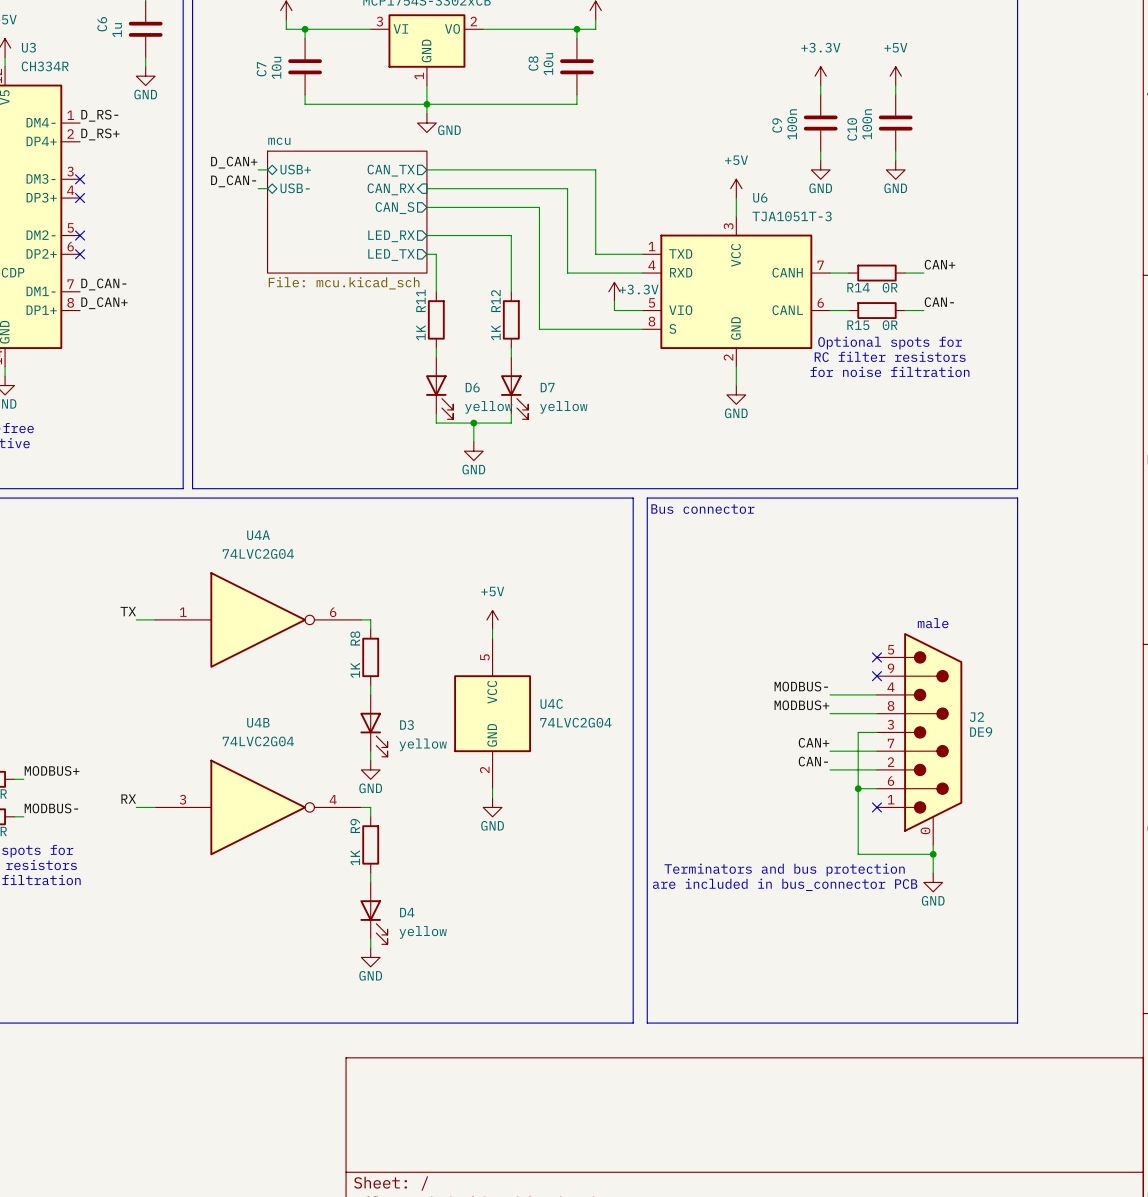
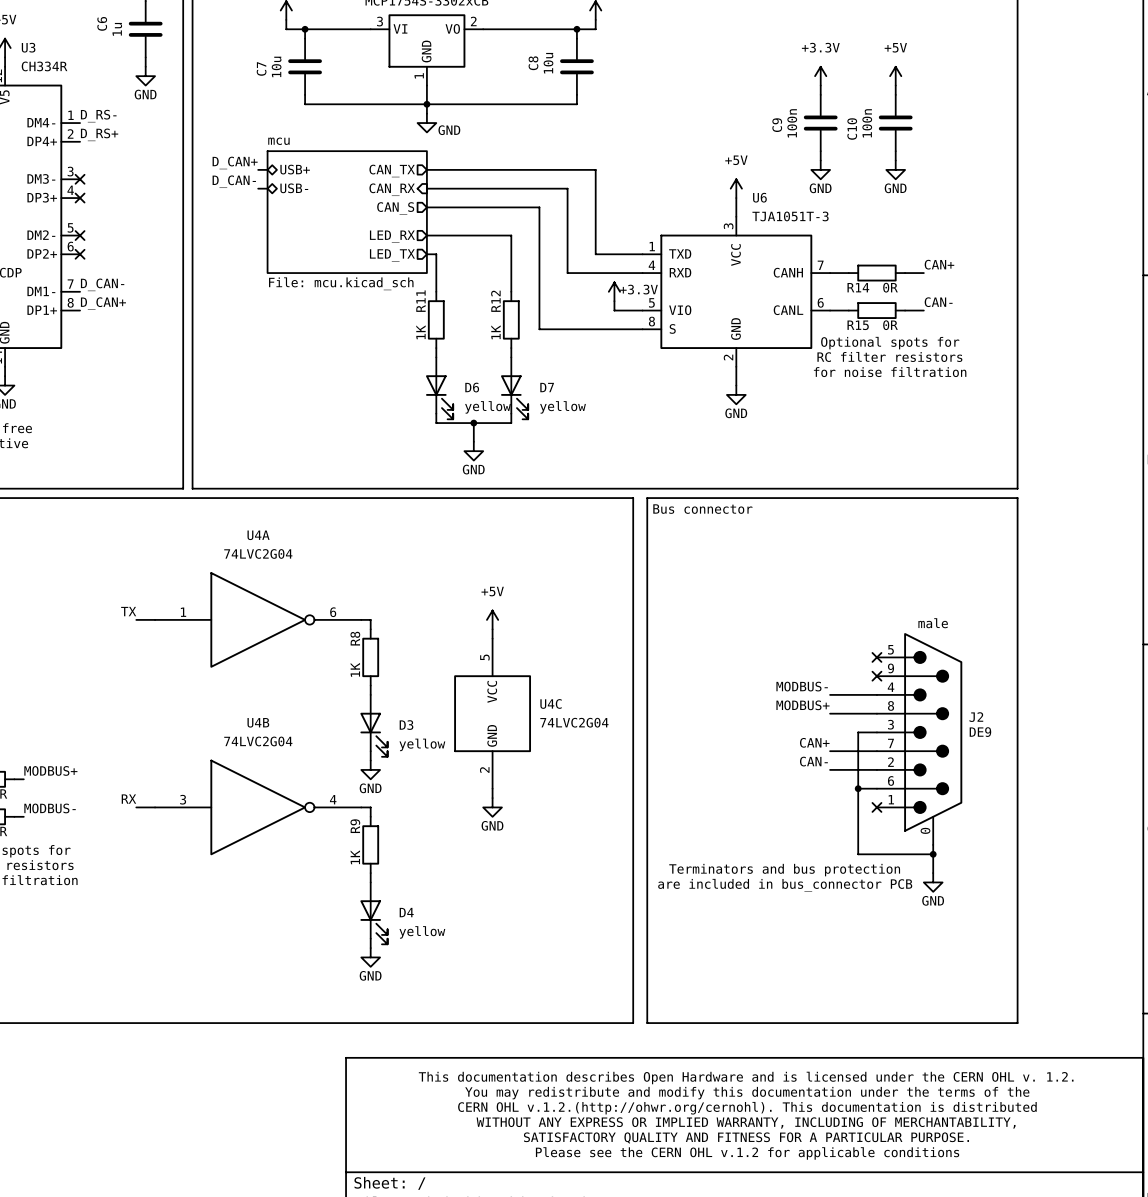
text: none -> This documentation describes Open Hardware and is licensed under the CERN OHL v. 1.2. (746, 1077)
text: none -> You may redistribute and modify this documentation under the terms of the (747, 1093)
text: none -> CERN OHL v.1.2.(http://ohwr.org/cernohl). This documentation is distributed (747, 1108)
text: none -> WITHOUT ANY EXPRESS OR IMPLIED WARRANTY, INCLUDING OF MERCHANTABILITY, (746, 1122)
text: none -> SATISFACTORY QUALITY AND FITNESS FOR A PARTICULAR PURPOSE. (746, 1138)
text: none -> Please see the CERN OHL v.1.2 for applicable conditions (747, 1153)

